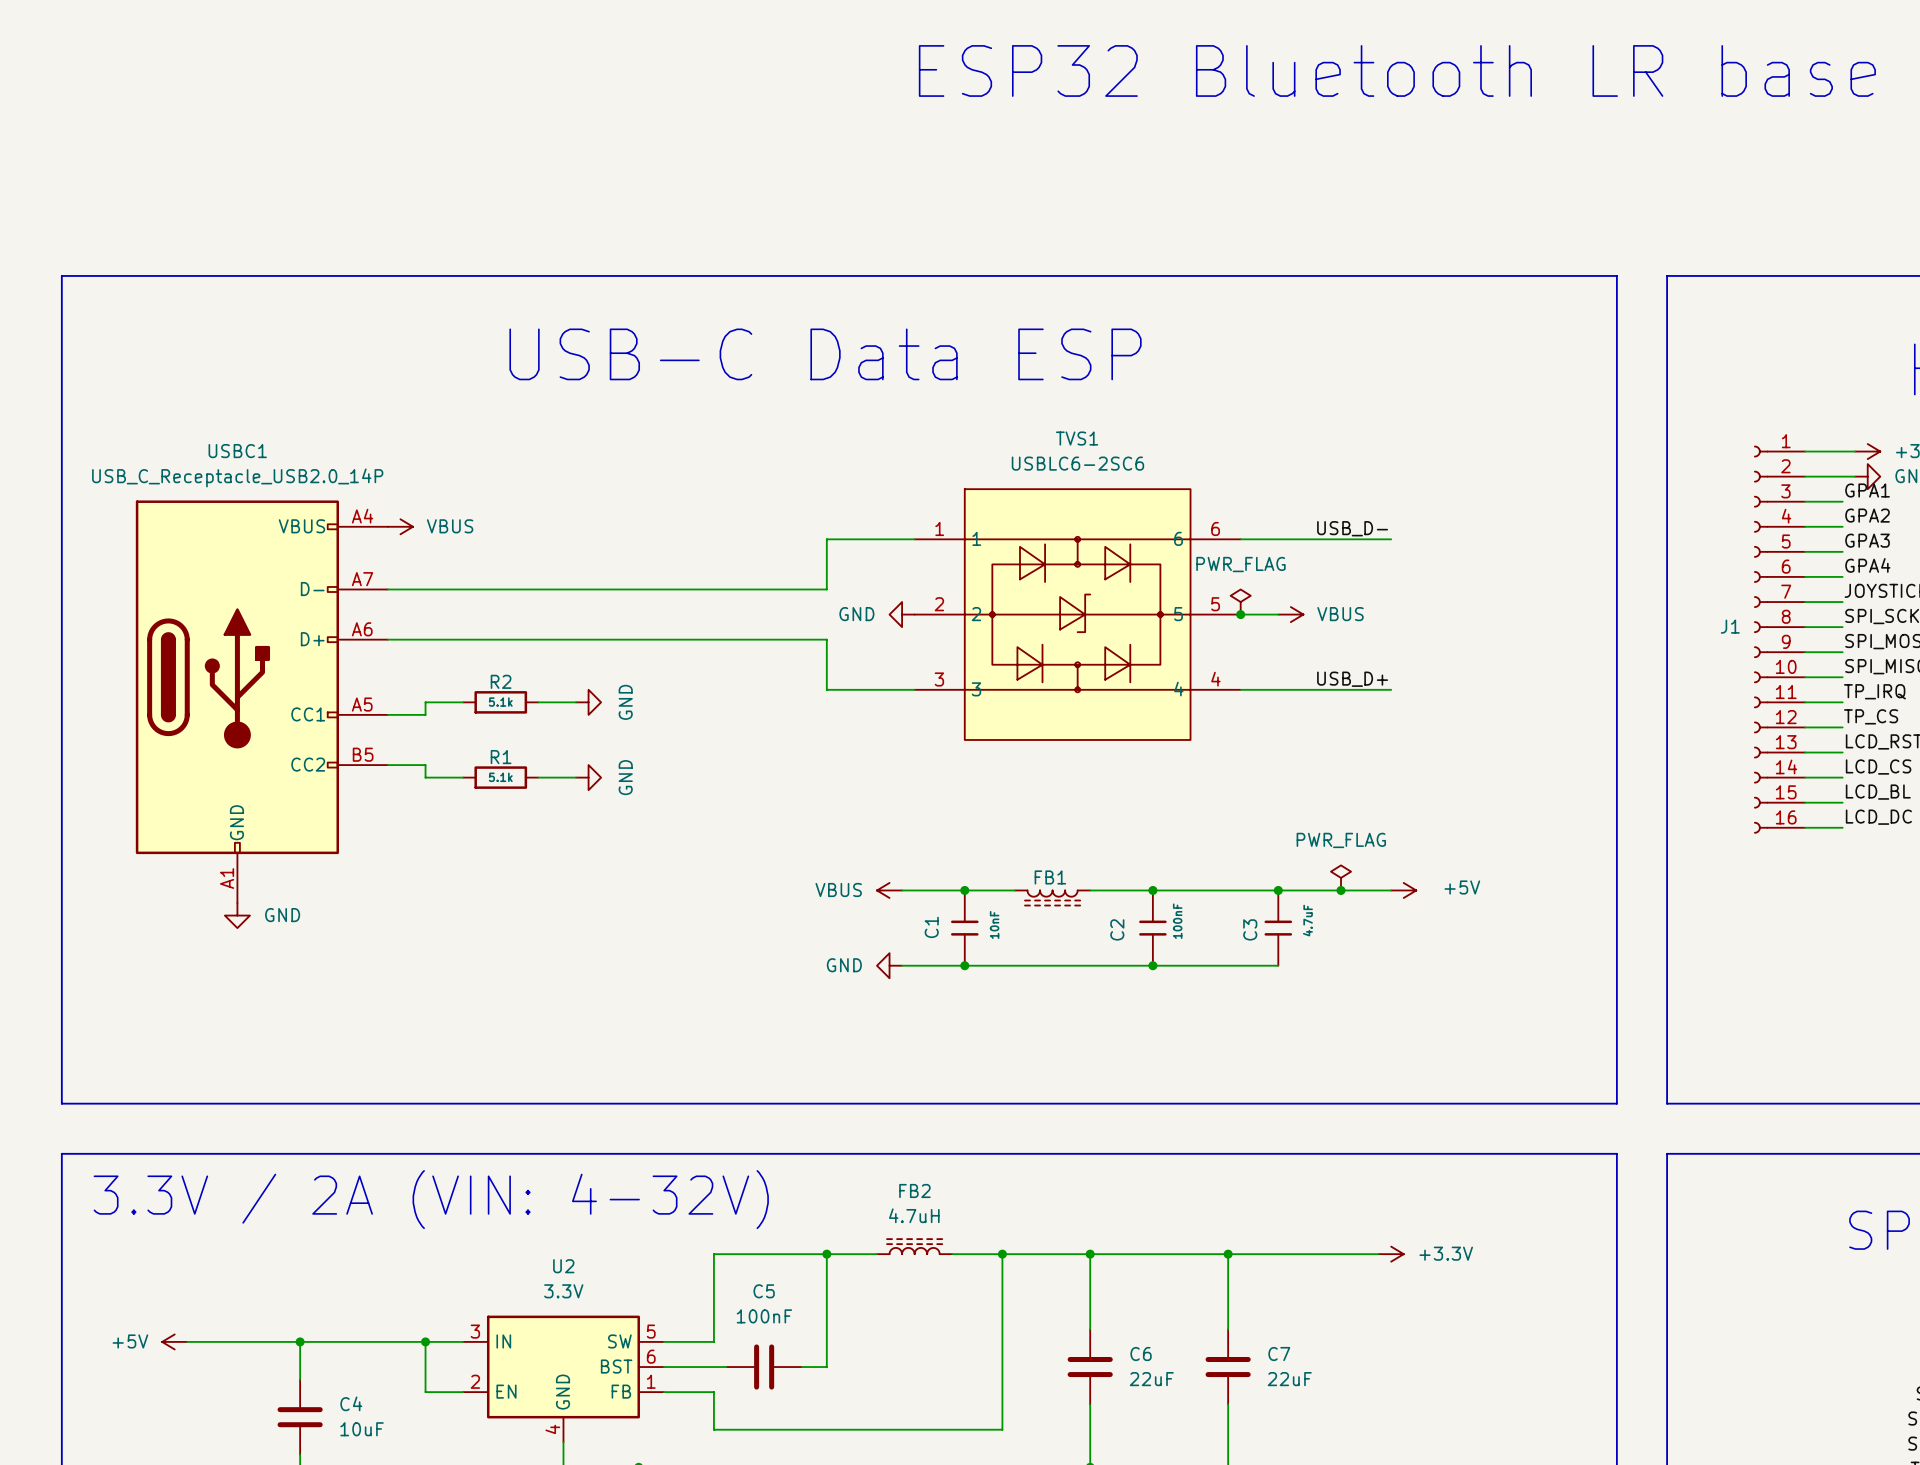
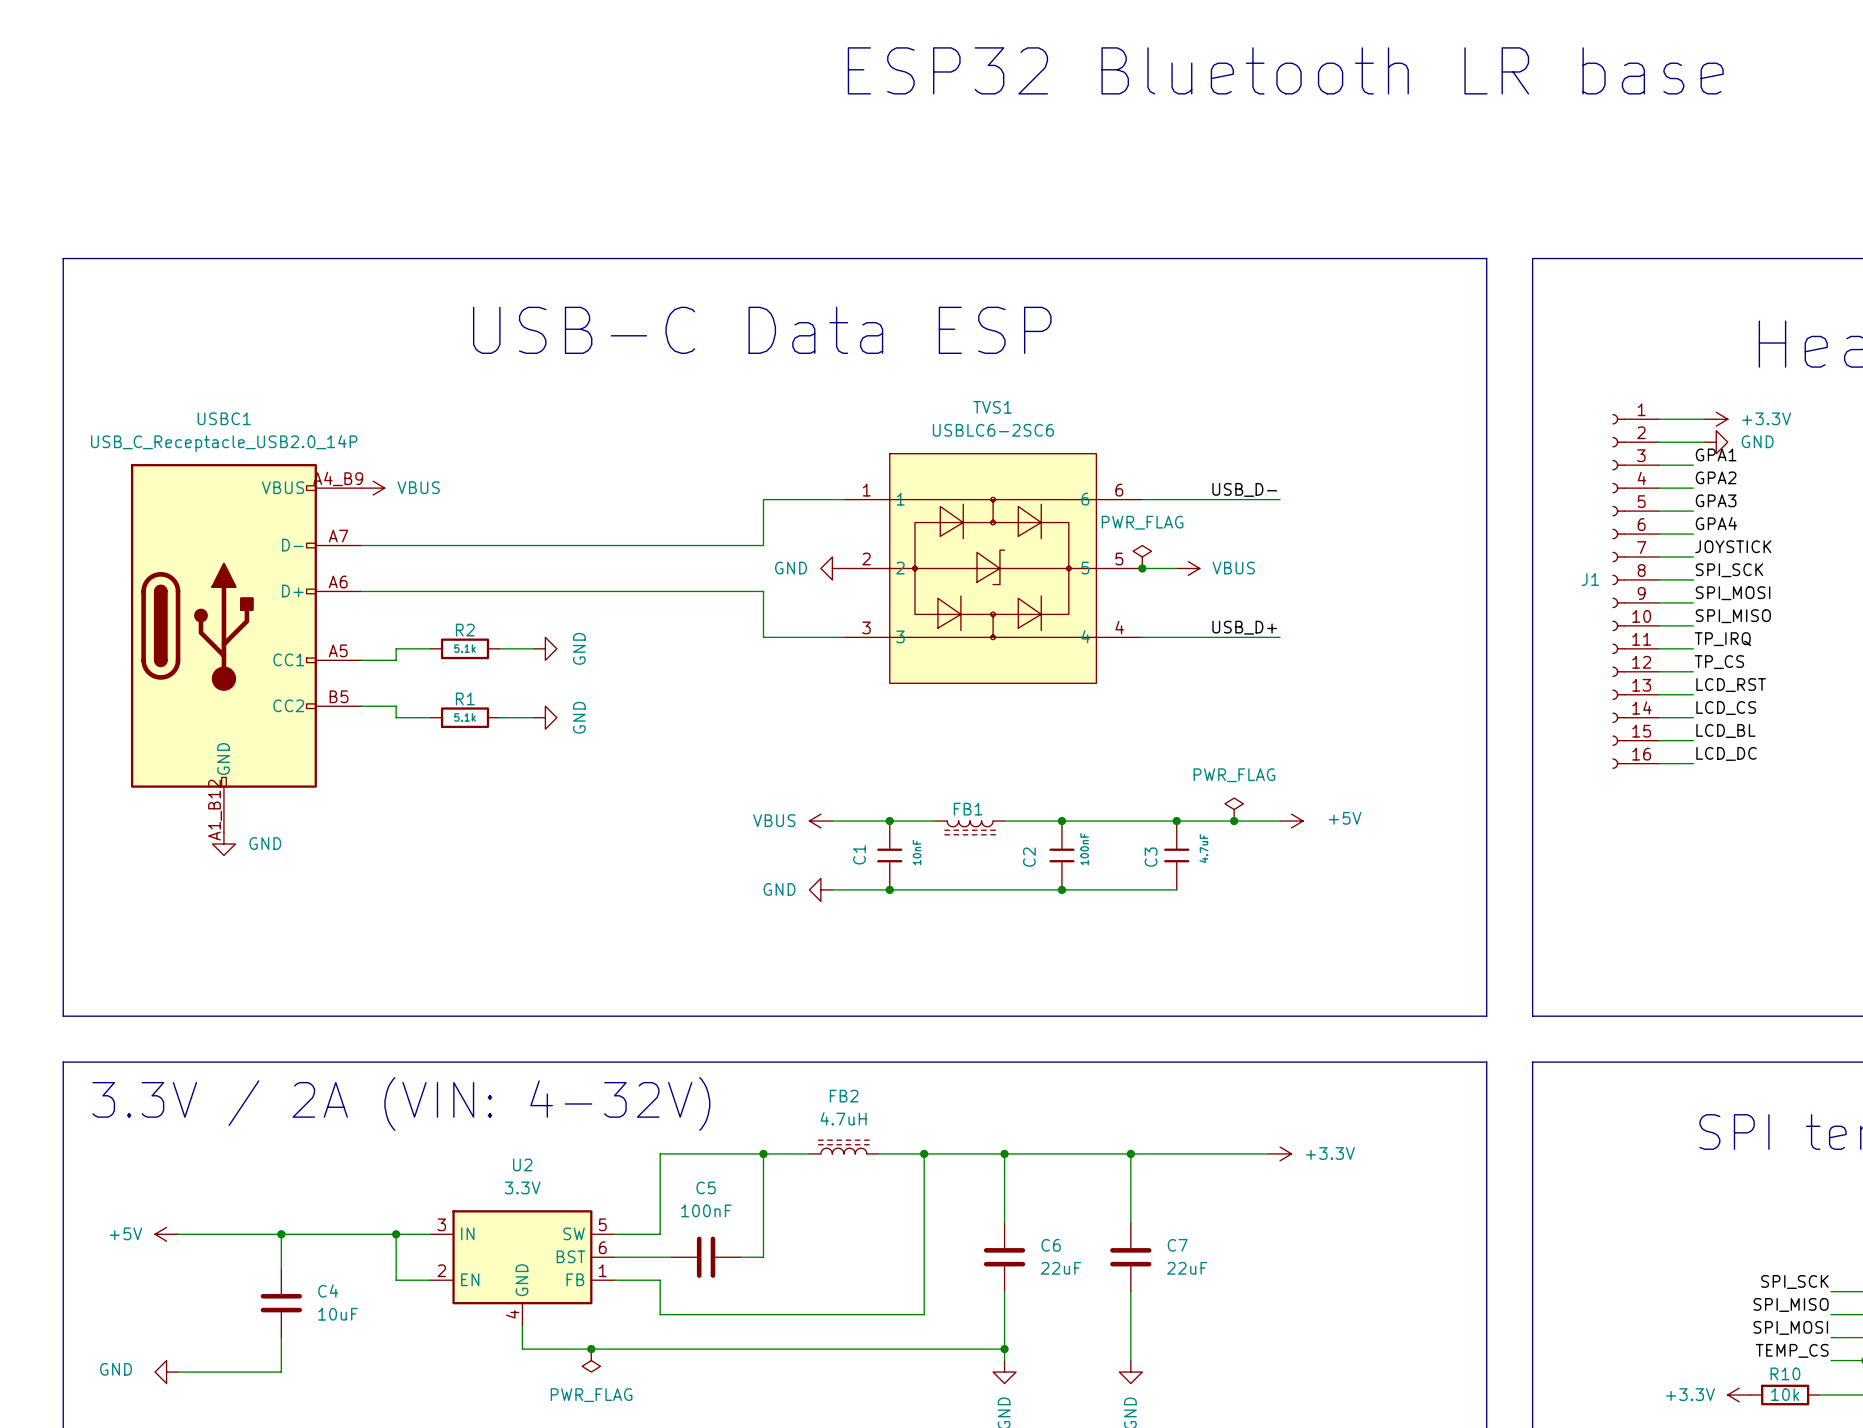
USBC1 pin number: A4 (362, 516) -> A4_B9 (338, 478)
USBC1 pin number: A1 (227, 878) -> A1_B12 (215, 810)

